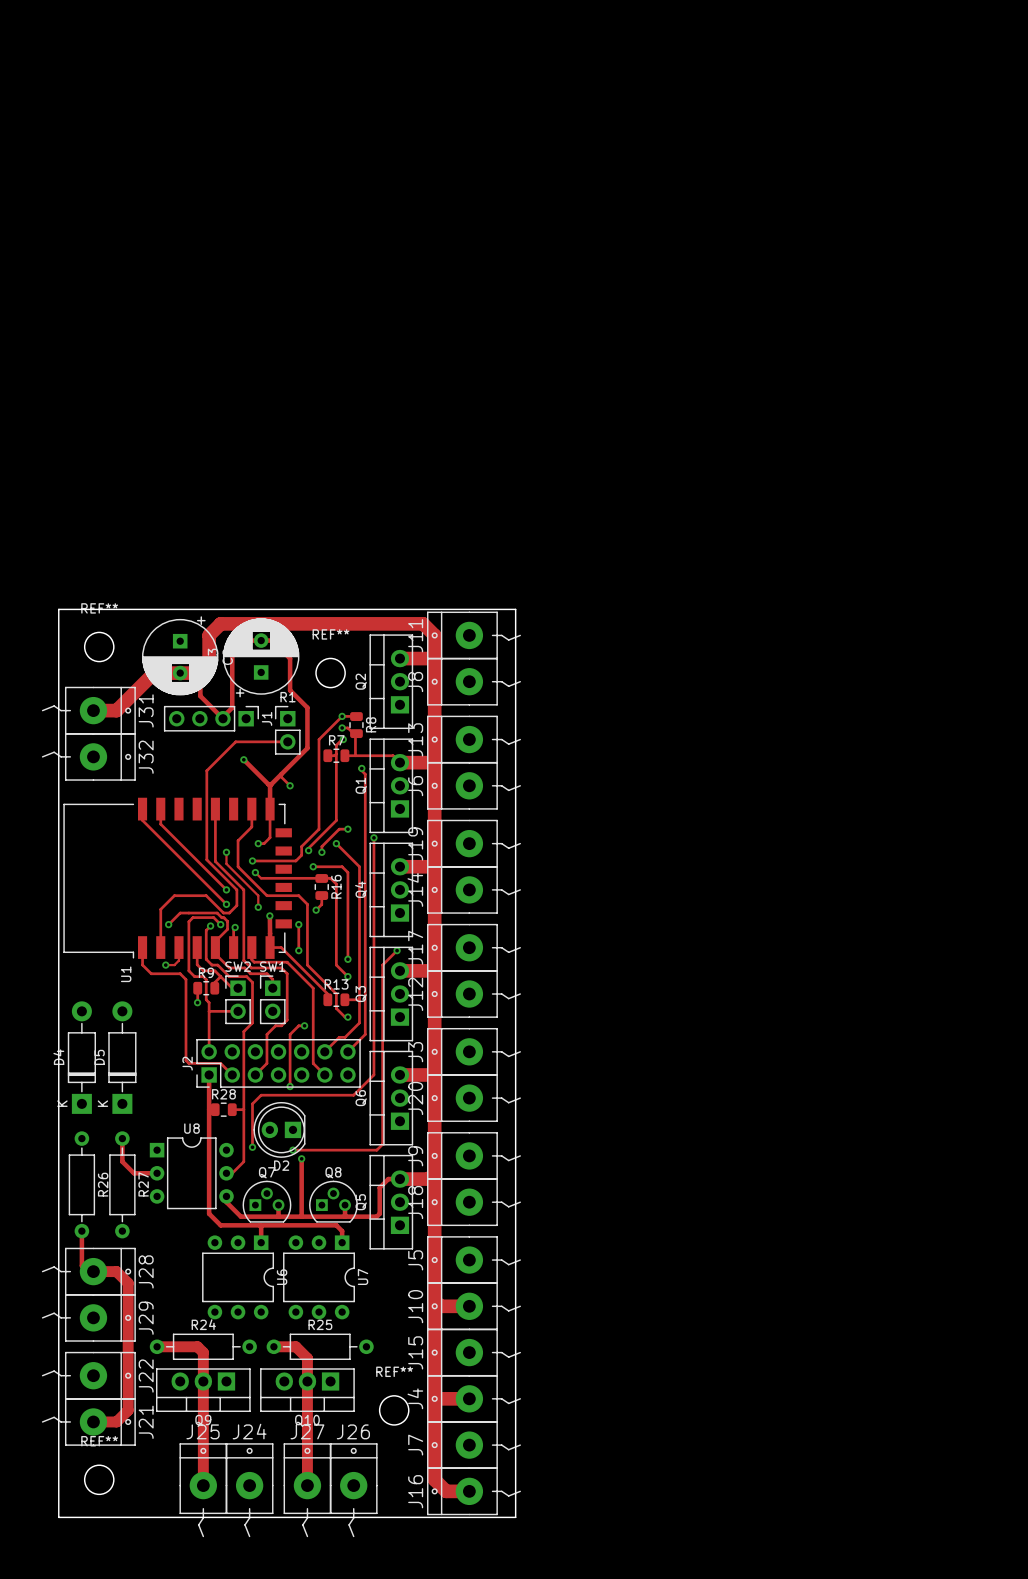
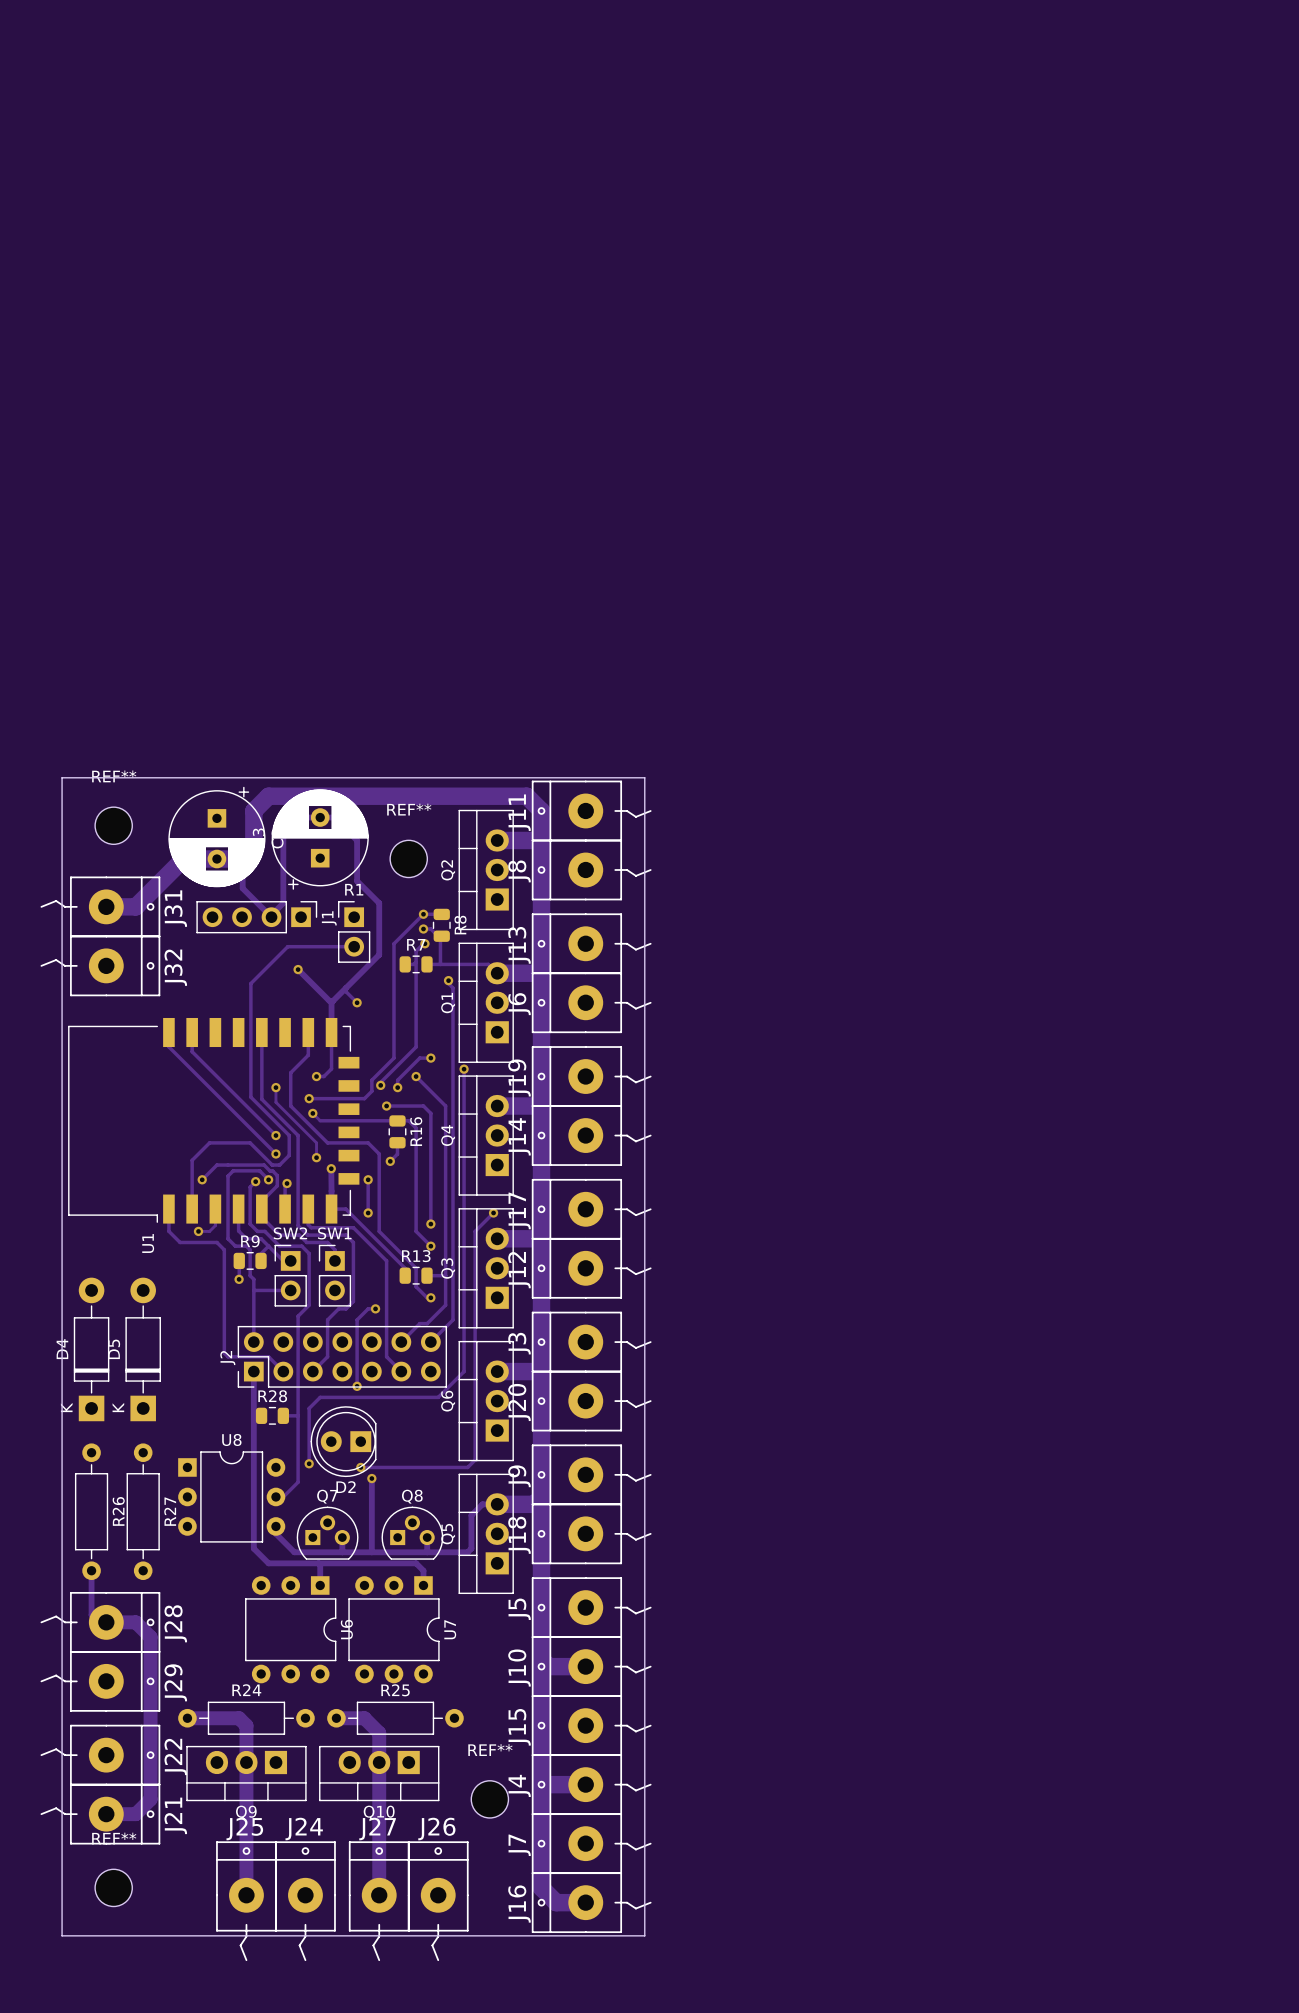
track: (122, 1138) (122, 1161) (133, 1173) (157, 1173) -> none

